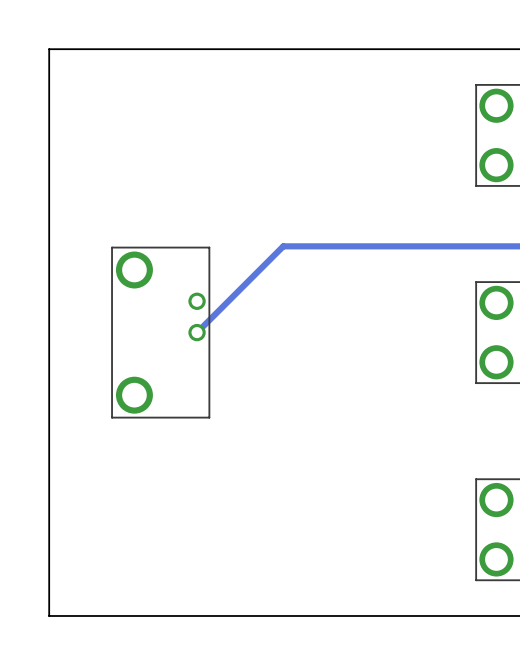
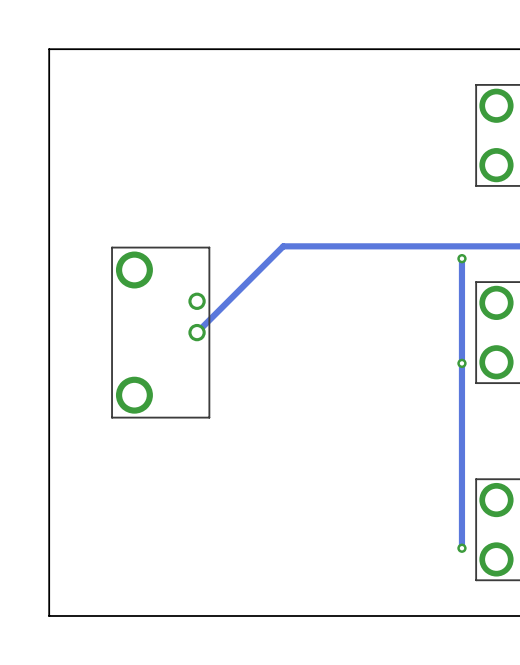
track: none -> (461, 258) (461, 548)
via: none -> (461, 258)
via: none -> (461, 363)
via: none -> (461, 548)

